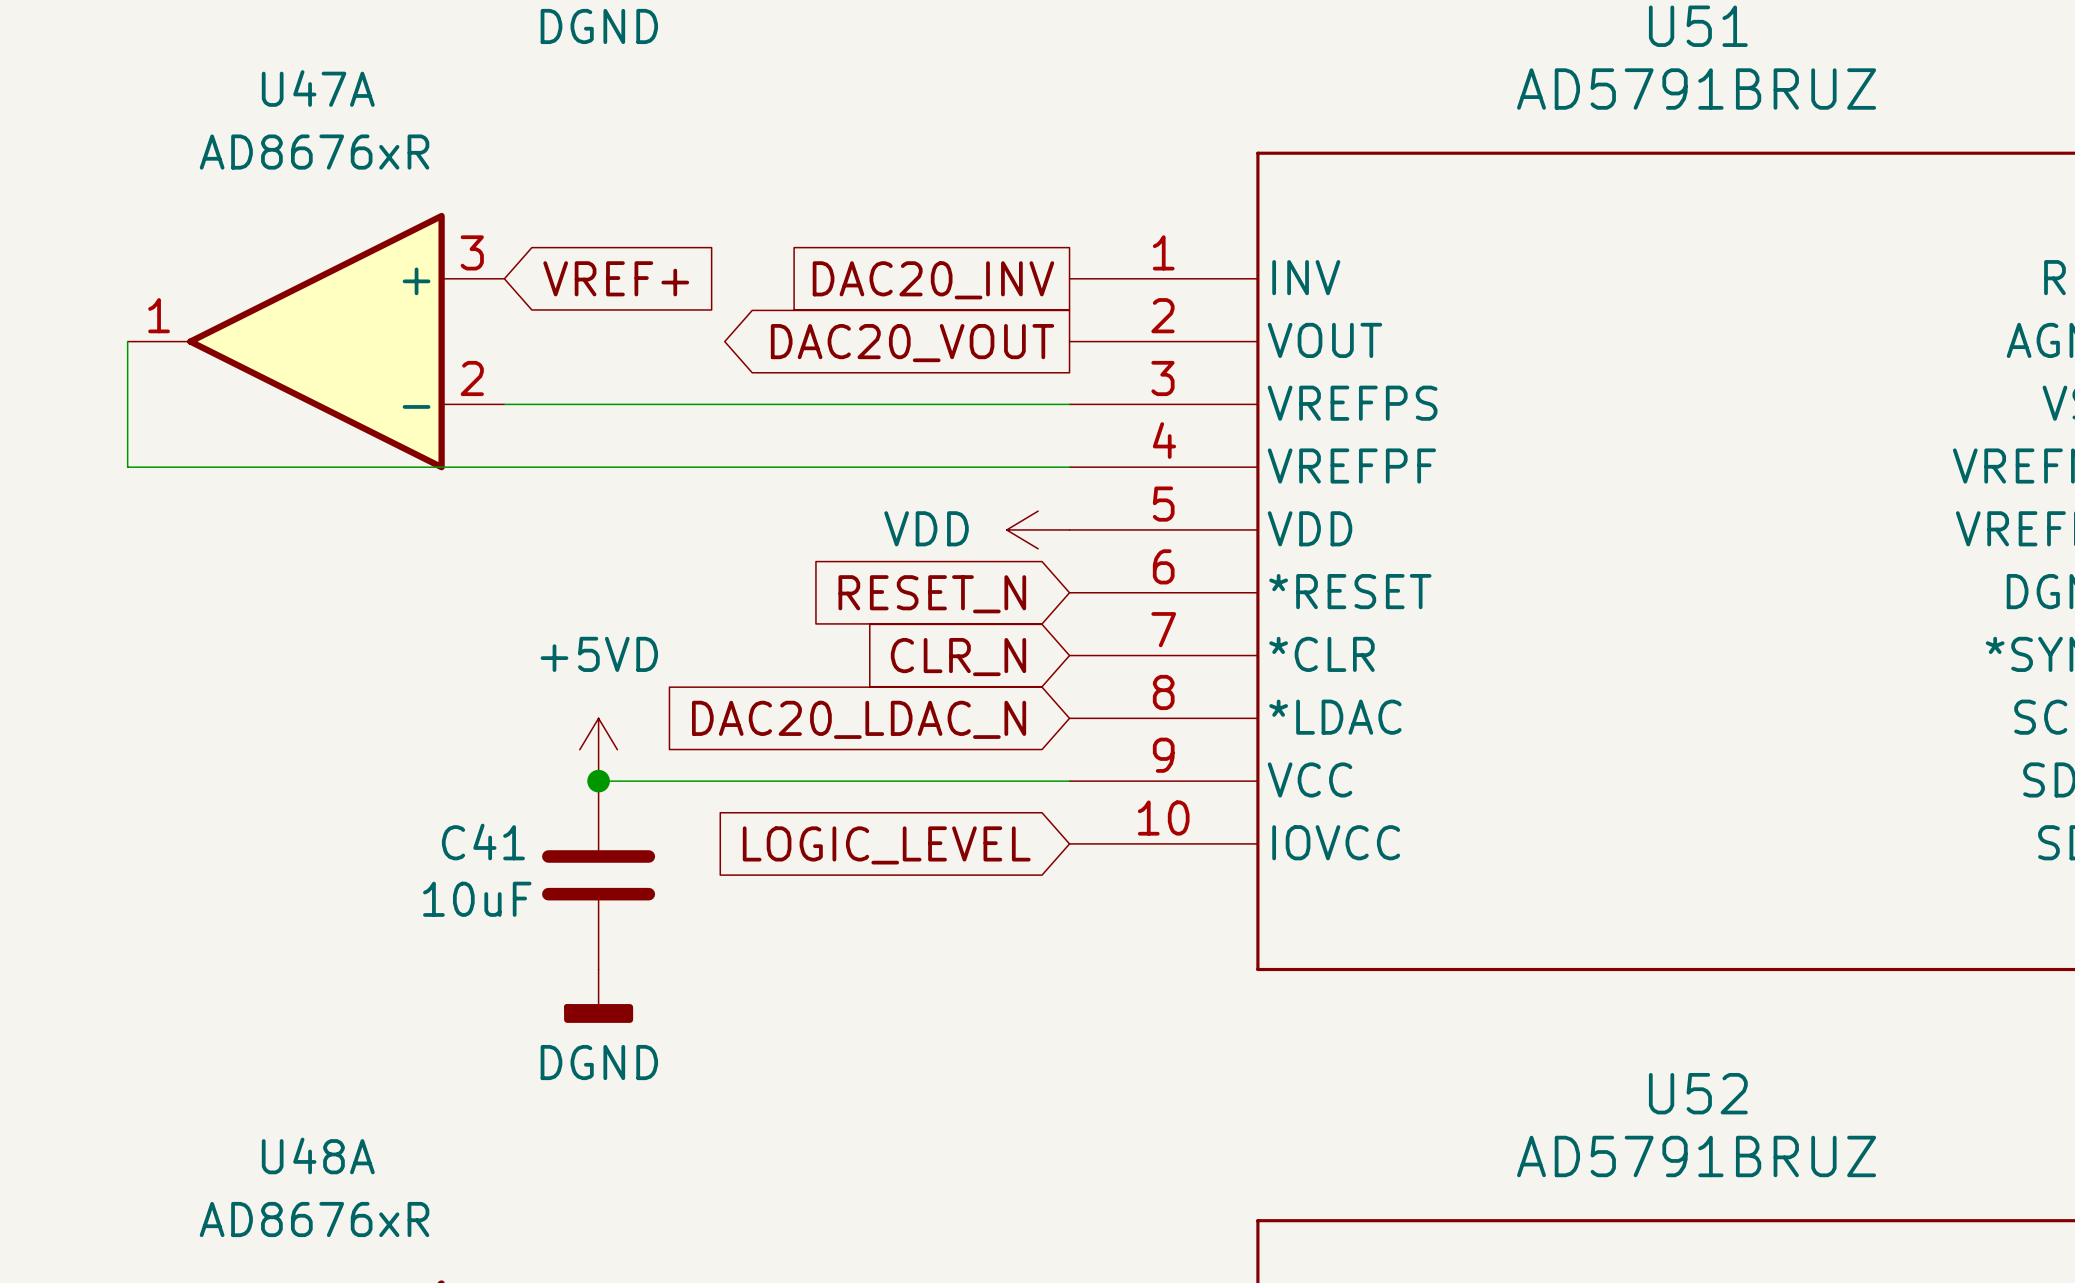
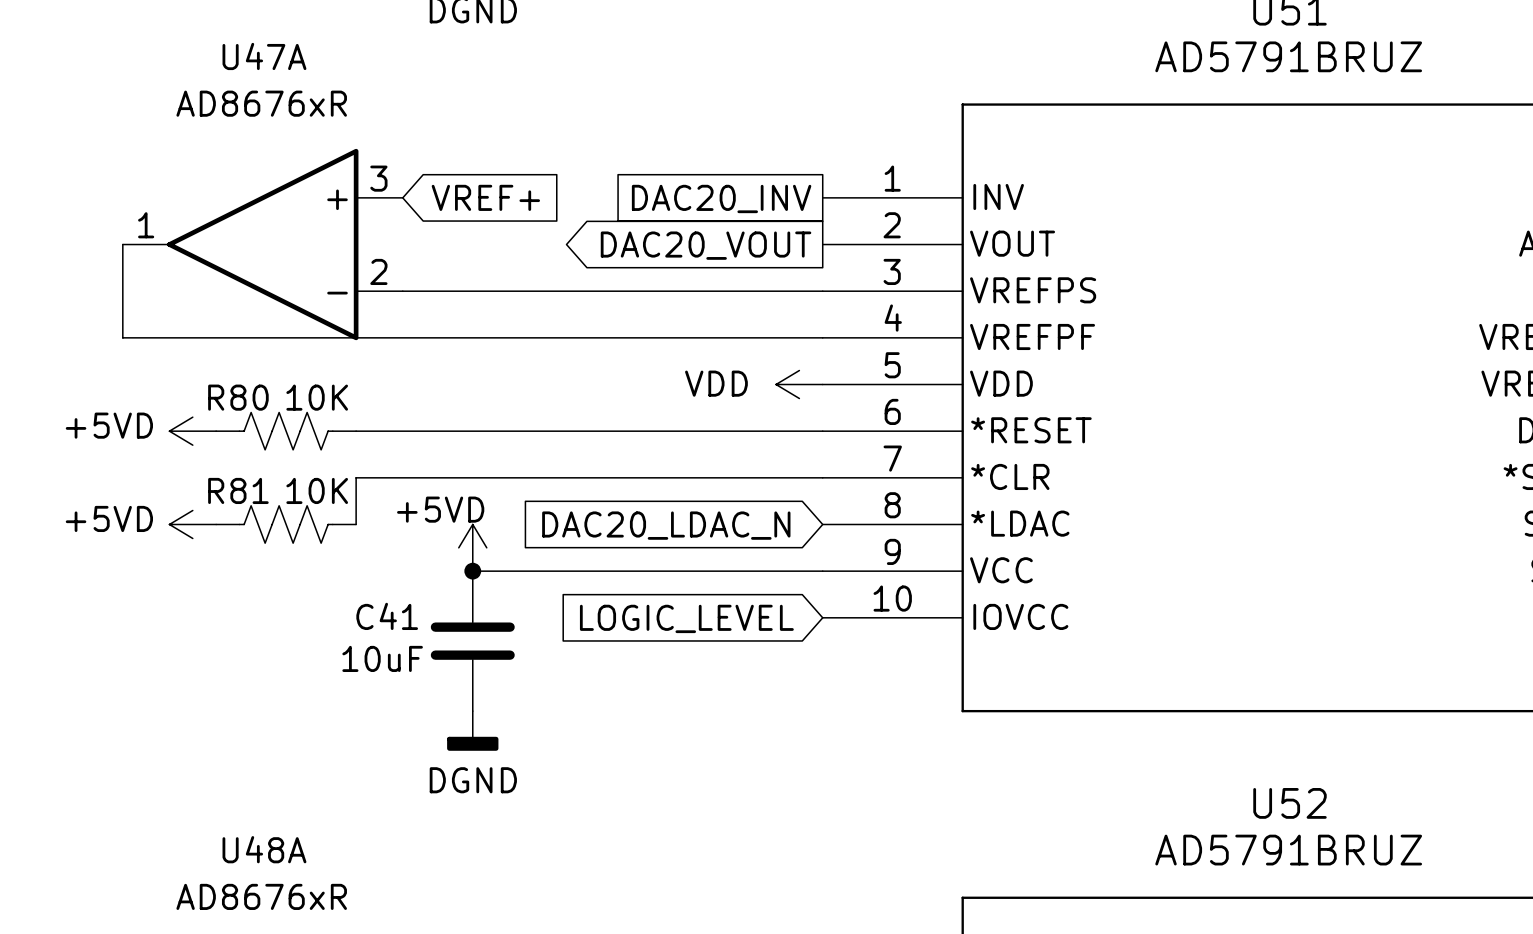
power symbol: none -> +5VD (192, 431)
R80: none -> 10K (286, 431)
wire: none -> (356, 431) (822, 431)
global label: RESET_N (932, 594) -> none
power symbol text position: +5VD (599, 654) -> +5VD (440, 509)
wire: none -> (822, 477) (356, 477) (356, 524)
global label: CLR_N (958, 657) -> none
power symbol: none -> +5VD (192, 524)
R81: none -> 10K (286, 524)

